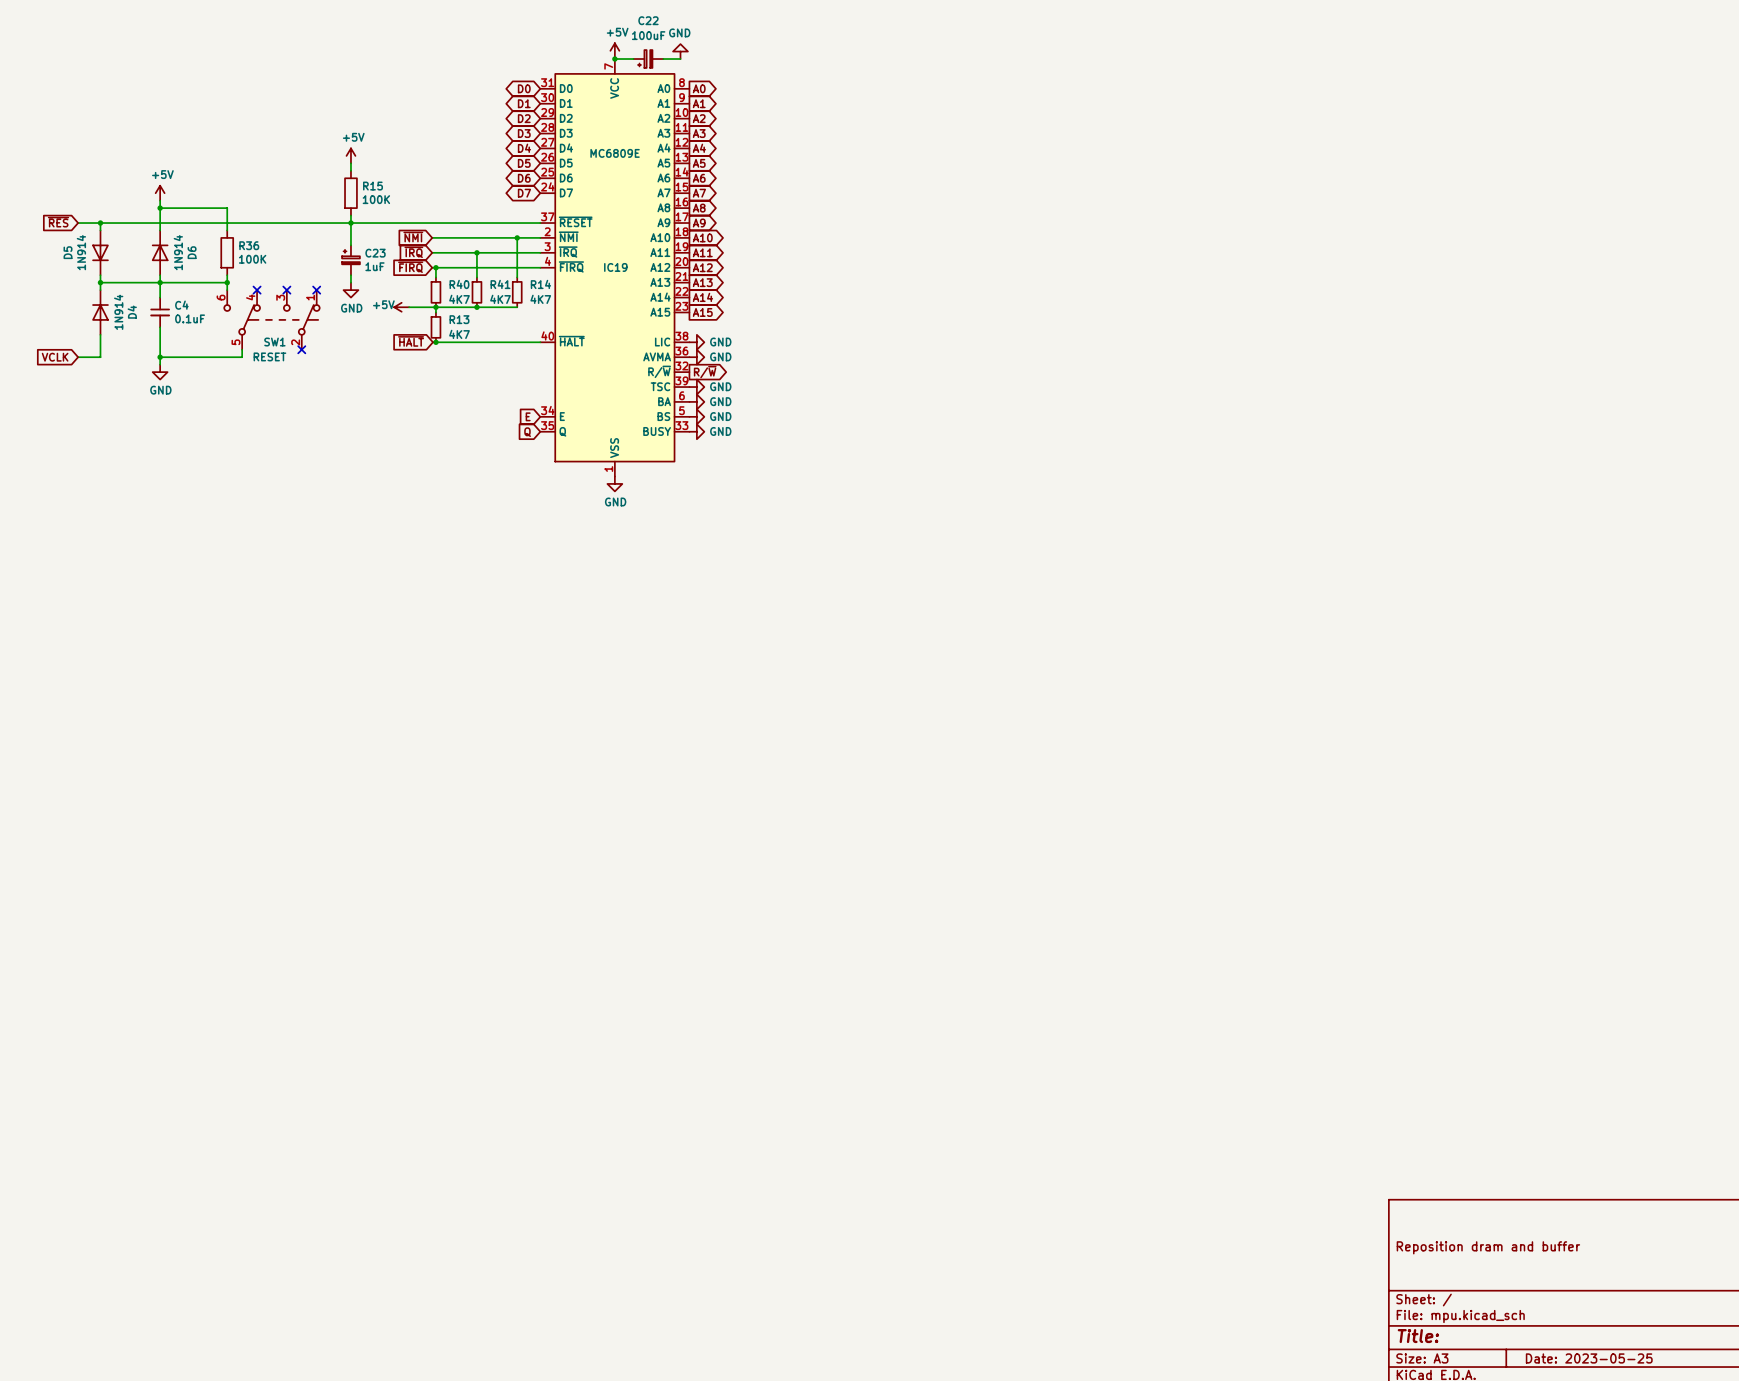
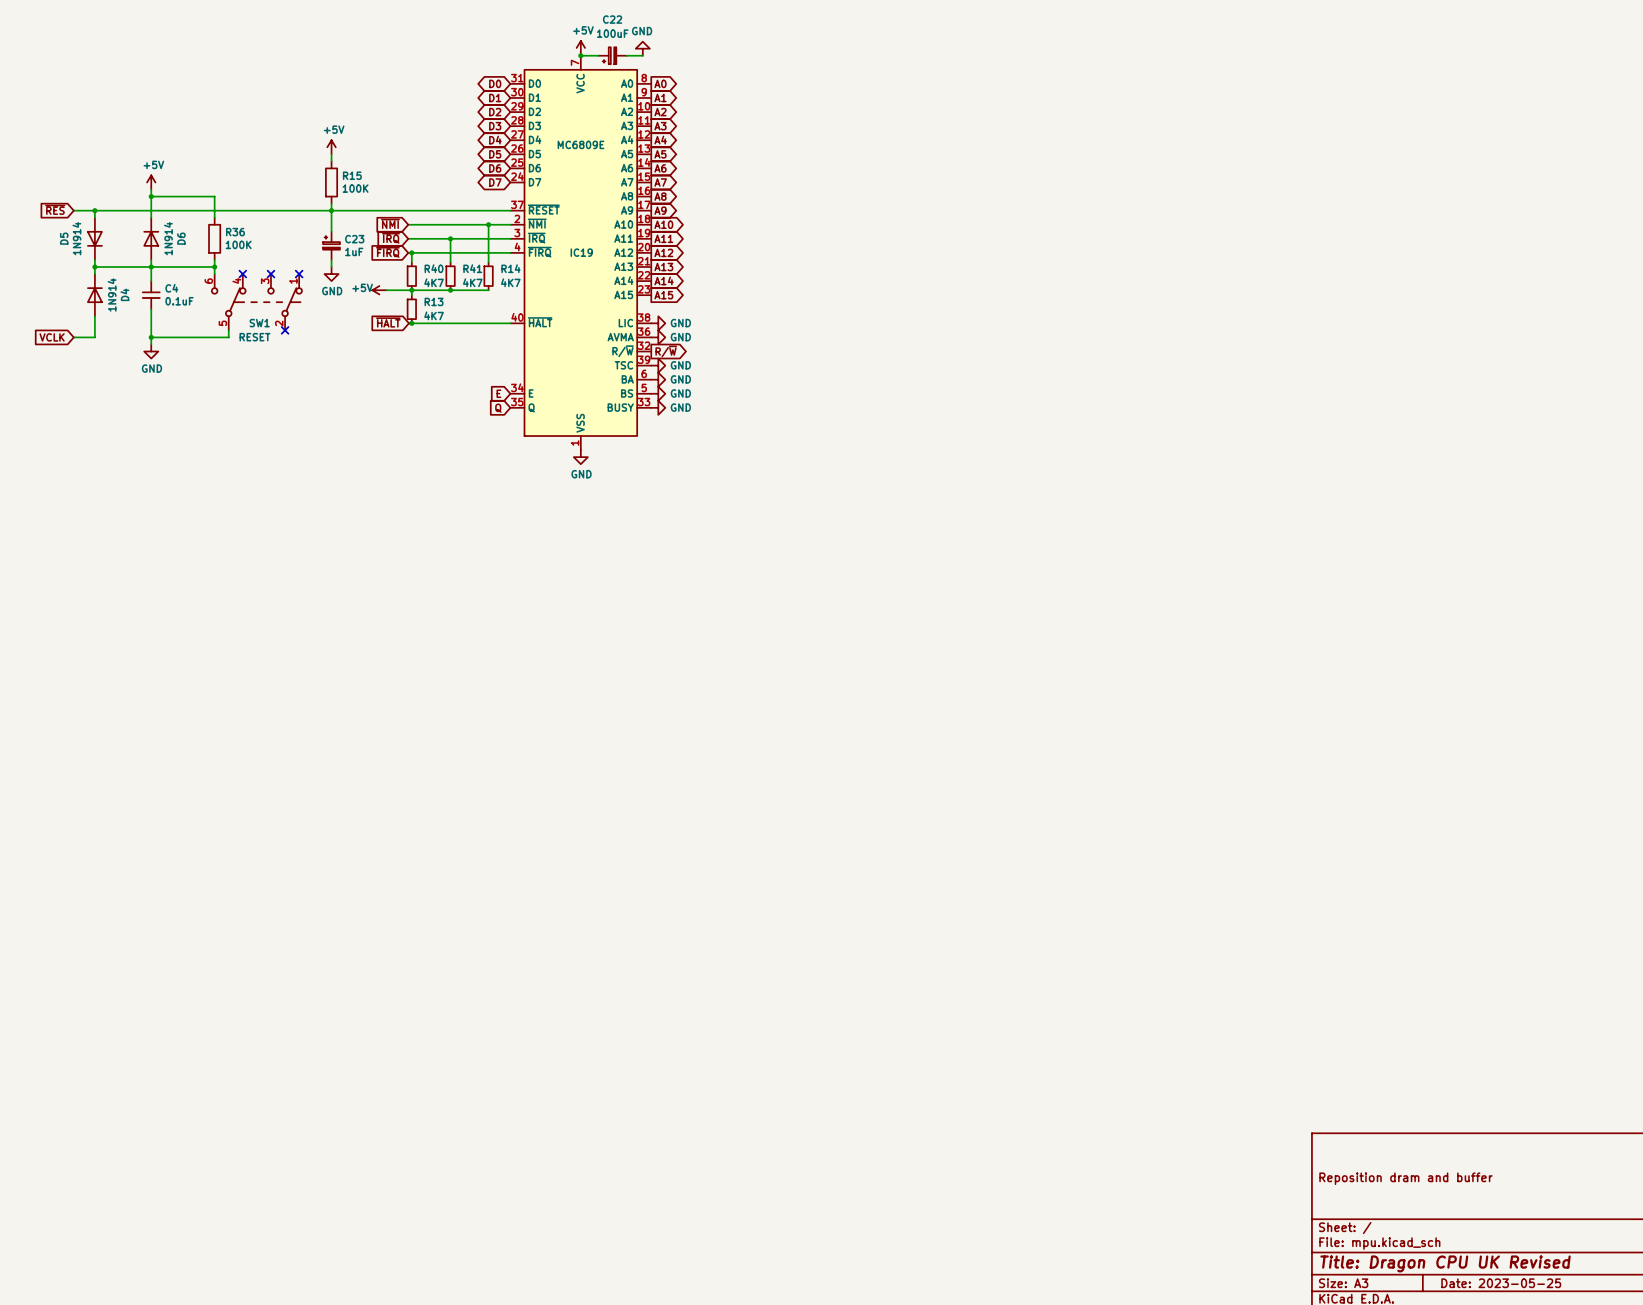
title block: Title: (1418, 1336) -> Title: Dragon CPU UK Revised (1445, 1263)

